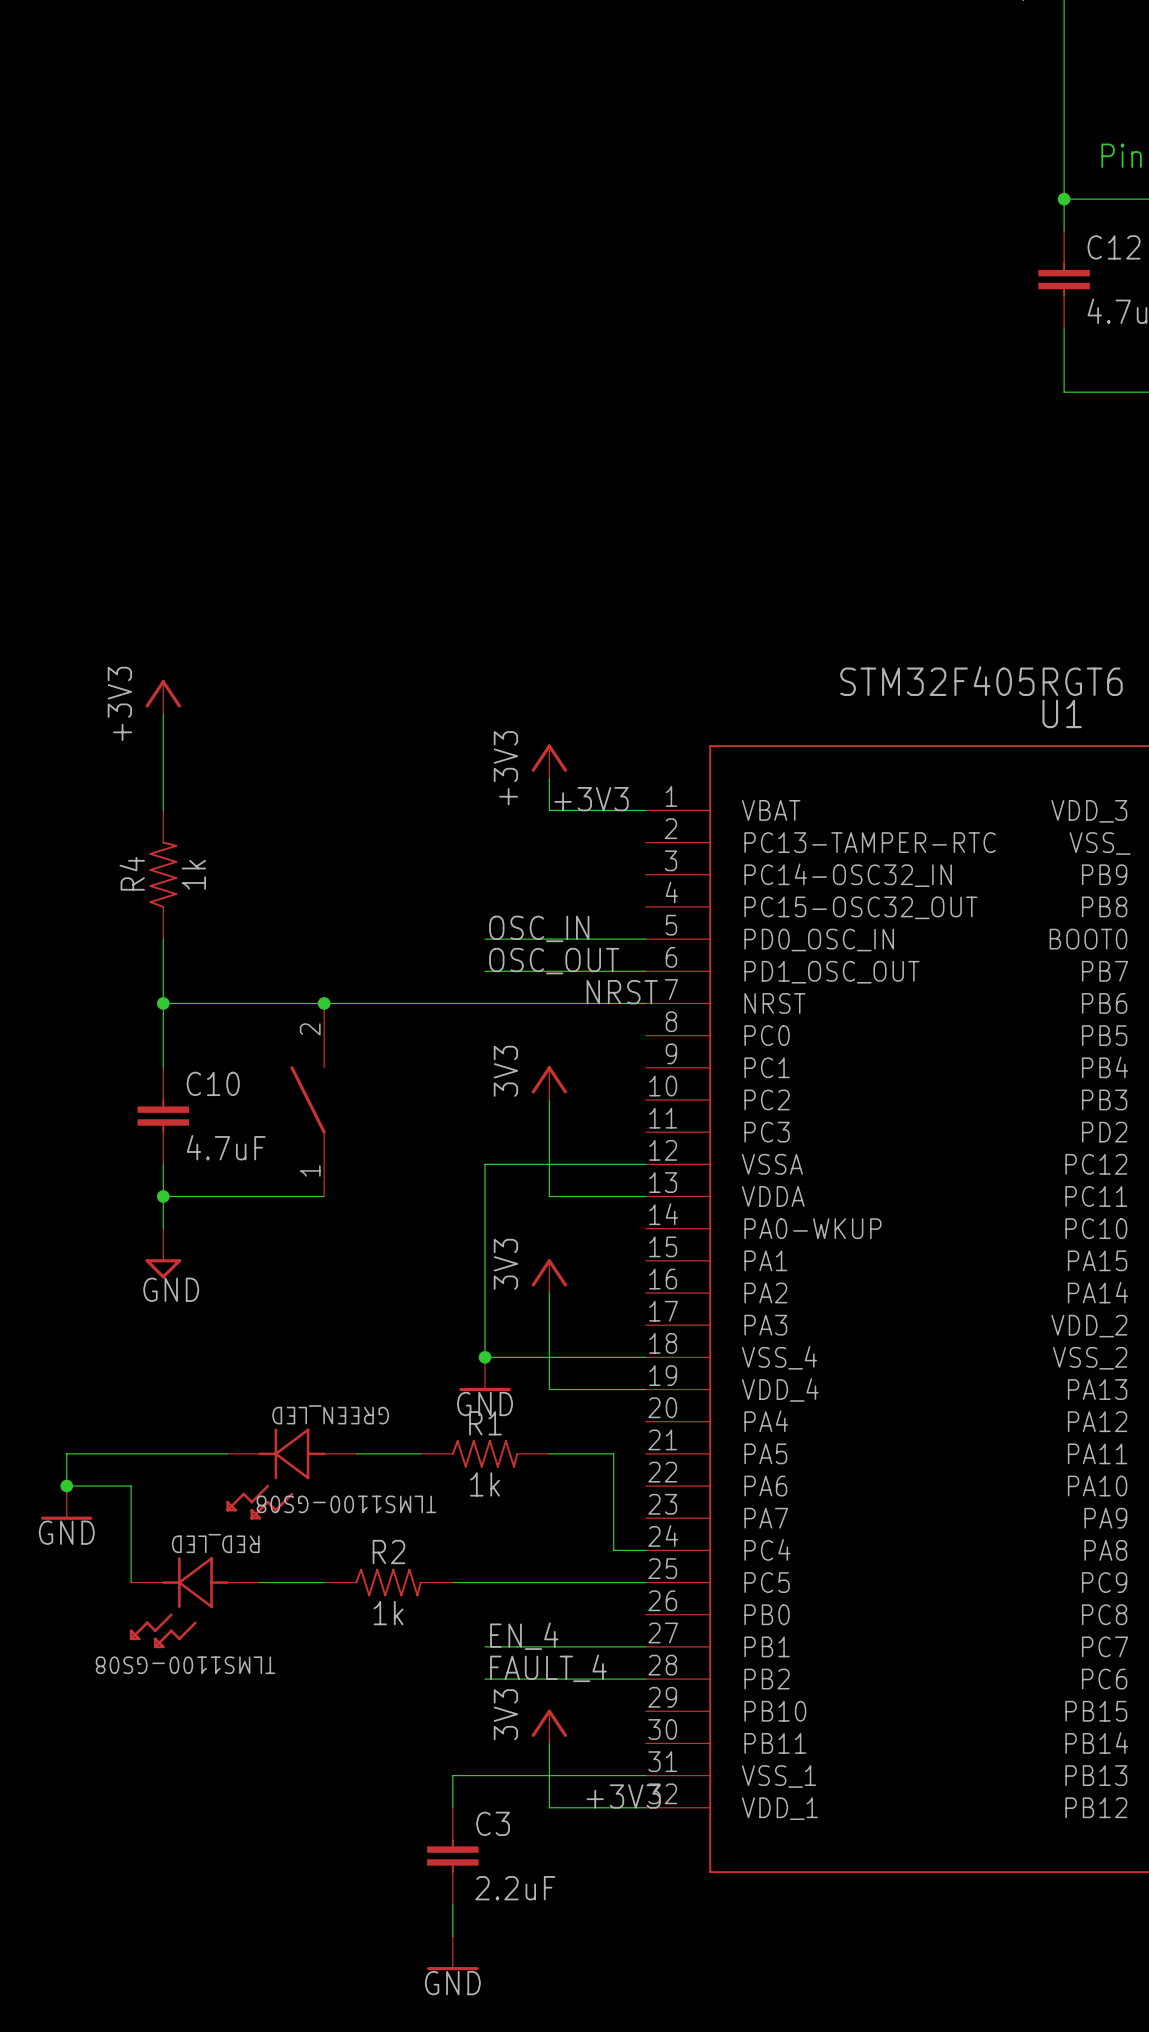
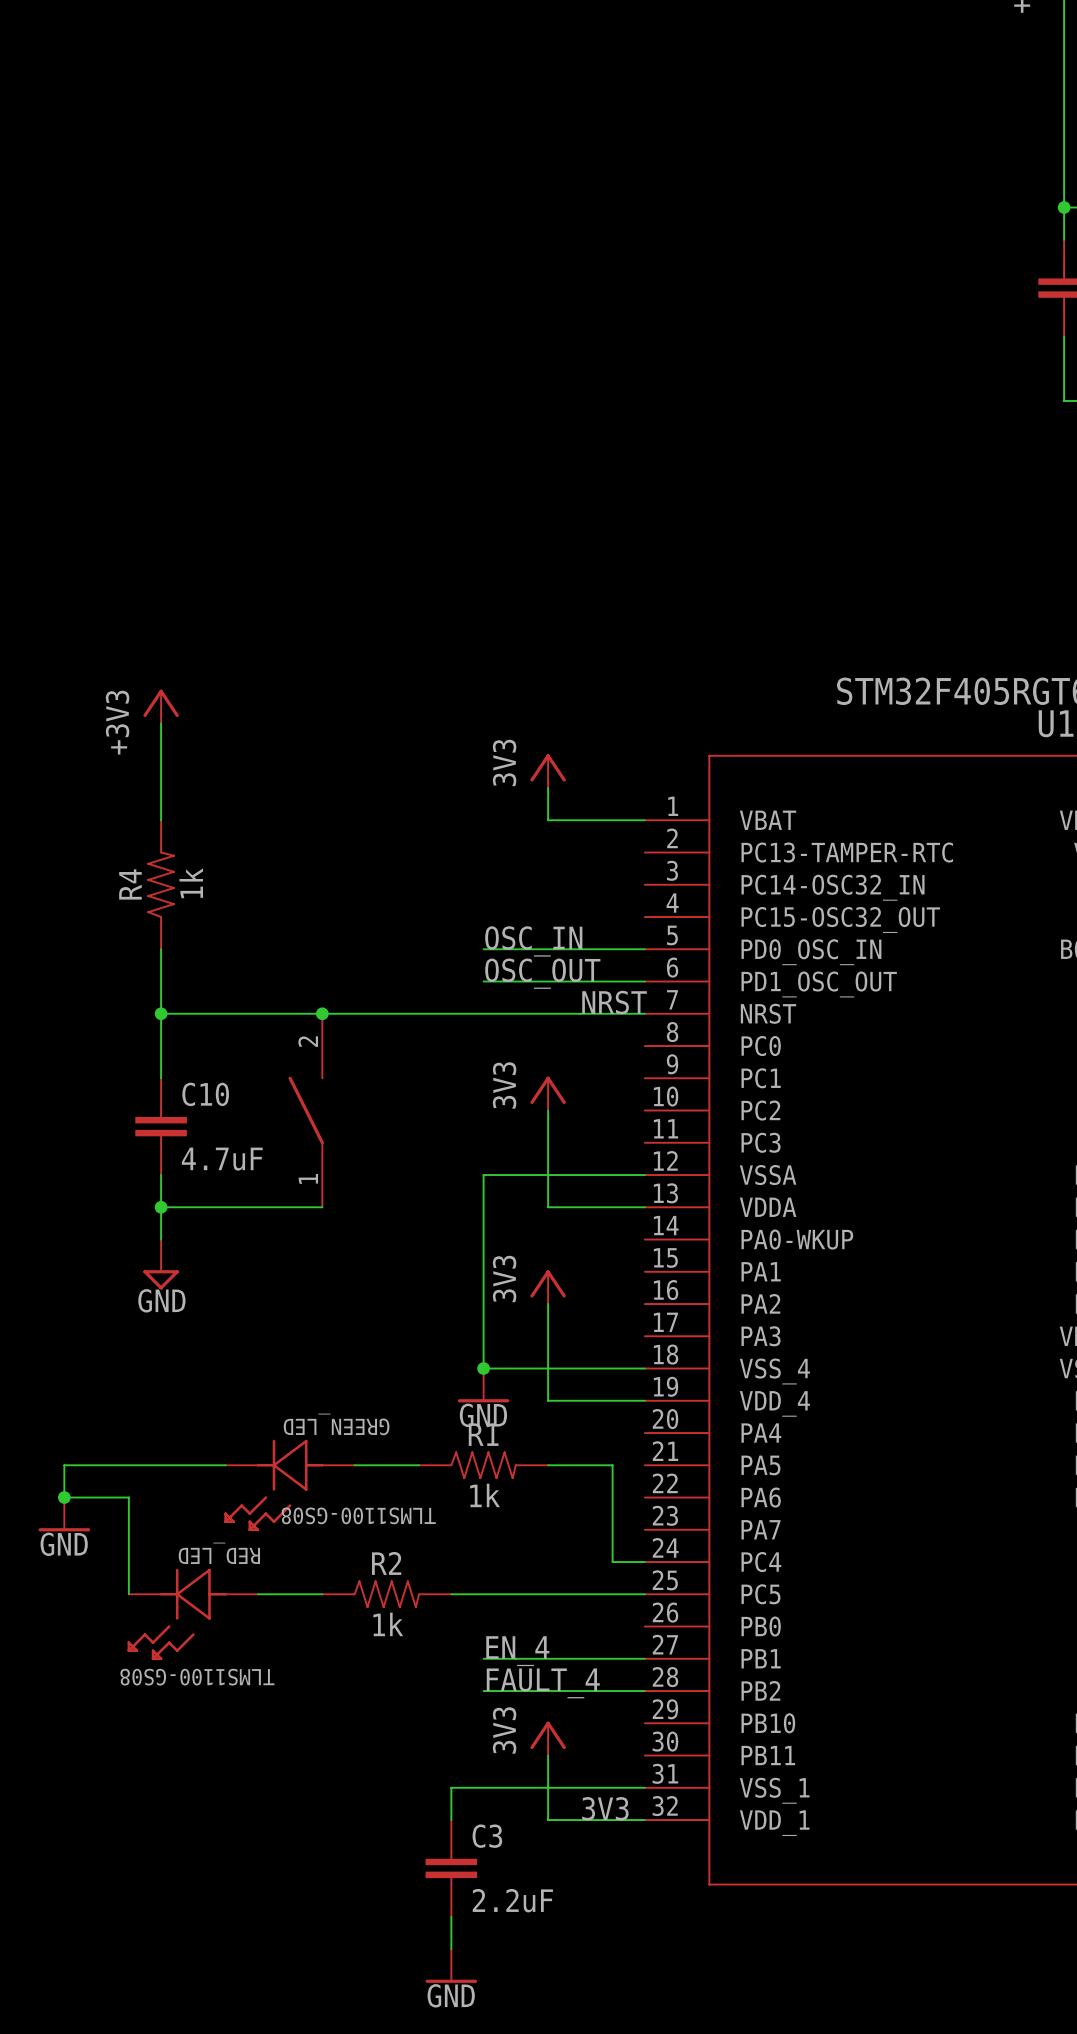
power symbol: +3V3 (549, 761) -> 3V3 (548, 771)
label: +3V3 (591, 799) -> none
label: +3V3 (623, 1796) -> 3V3 (605, 1808)

